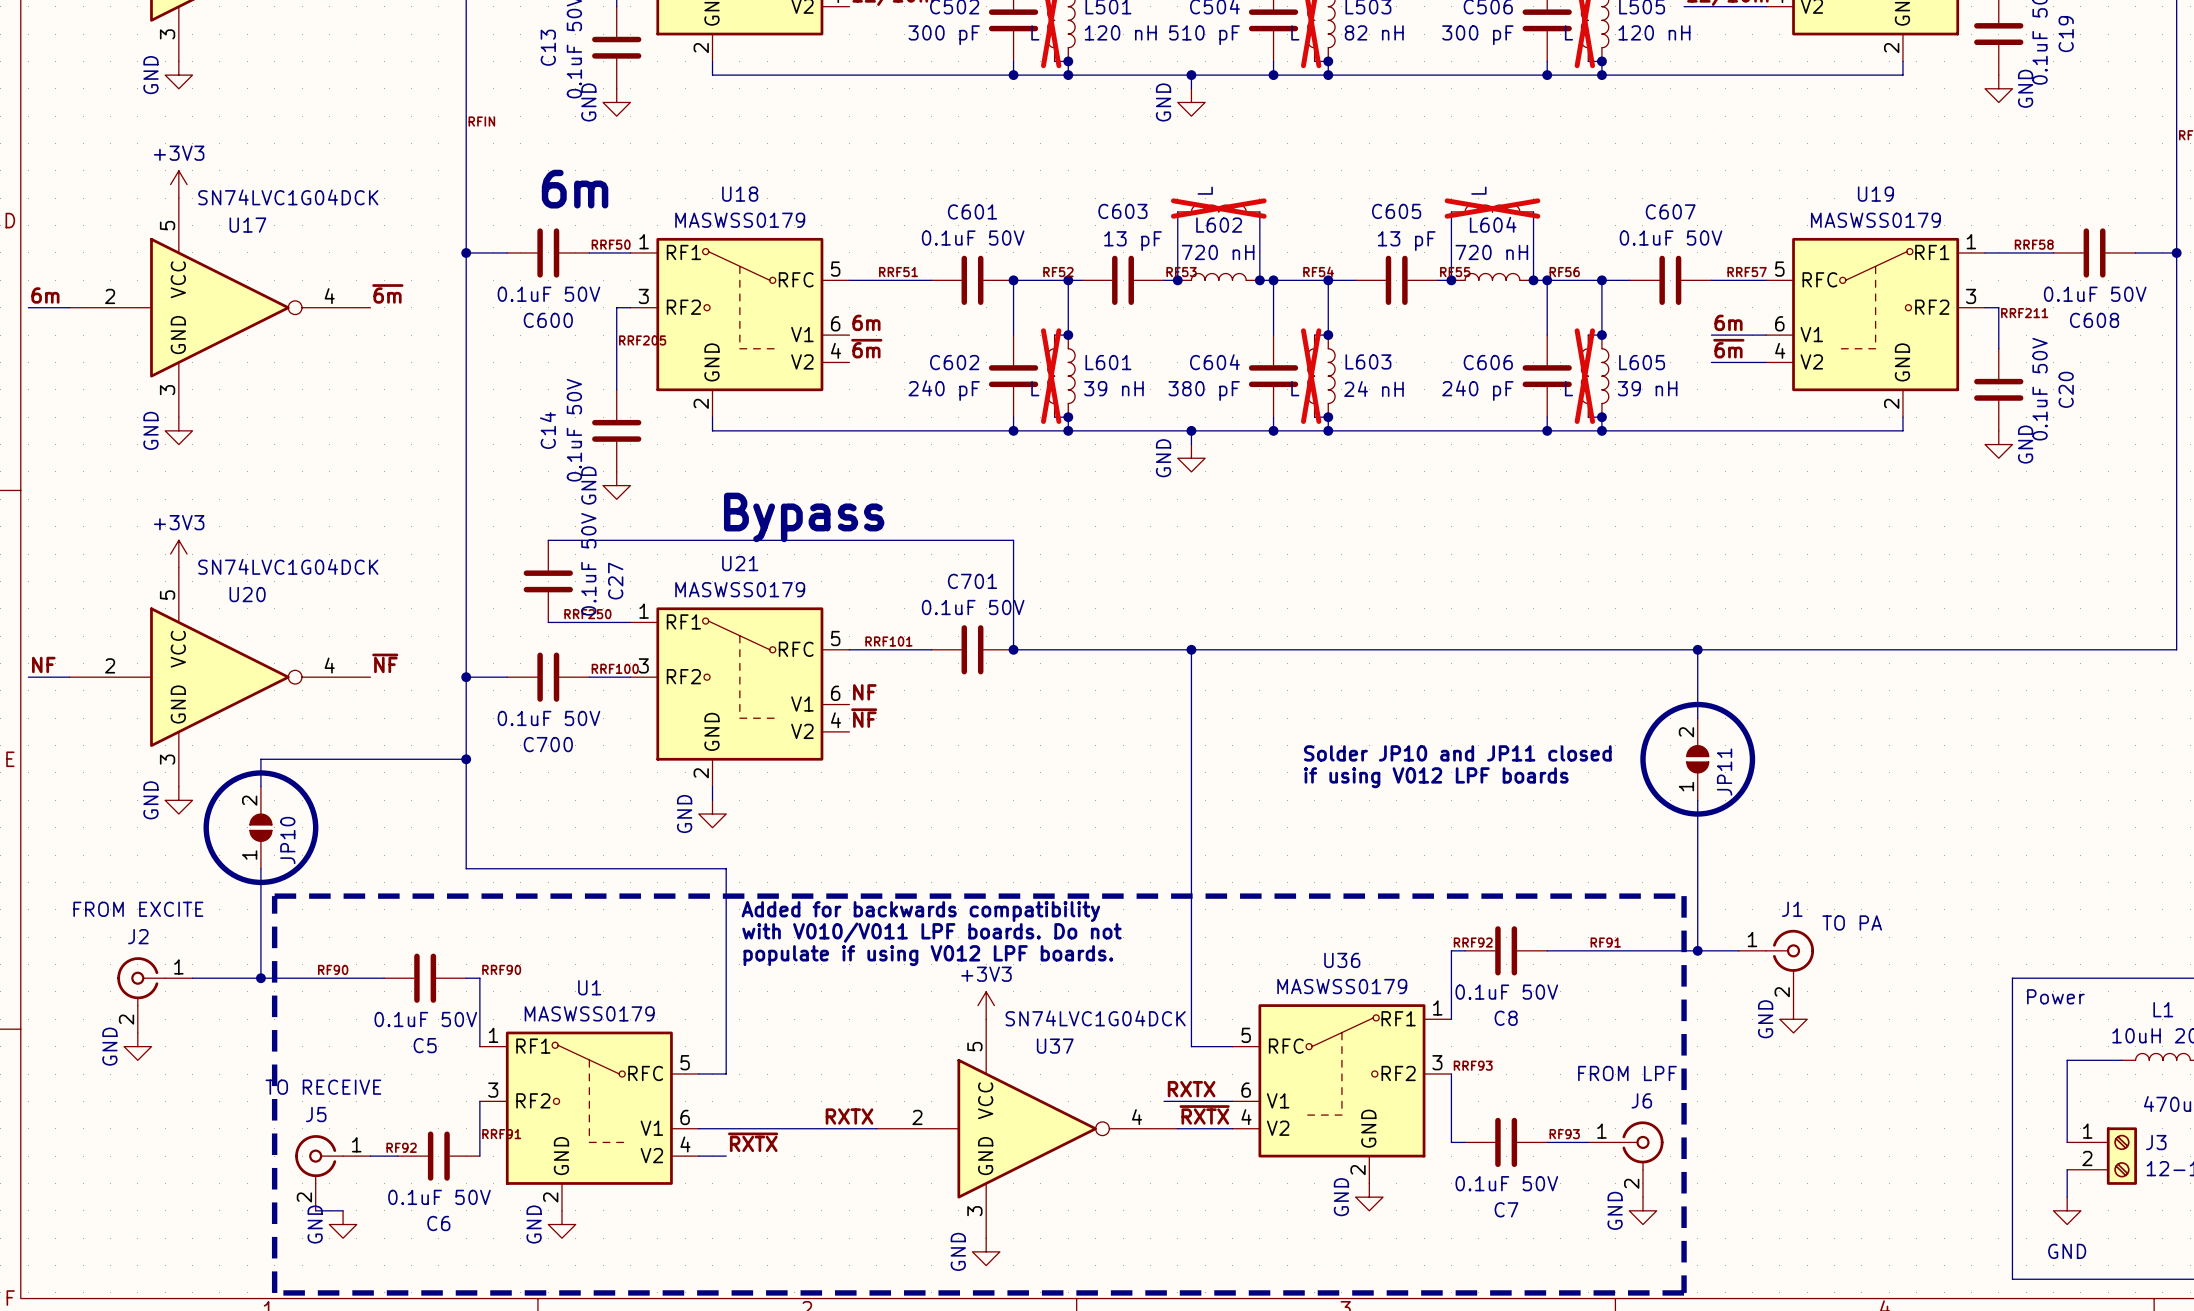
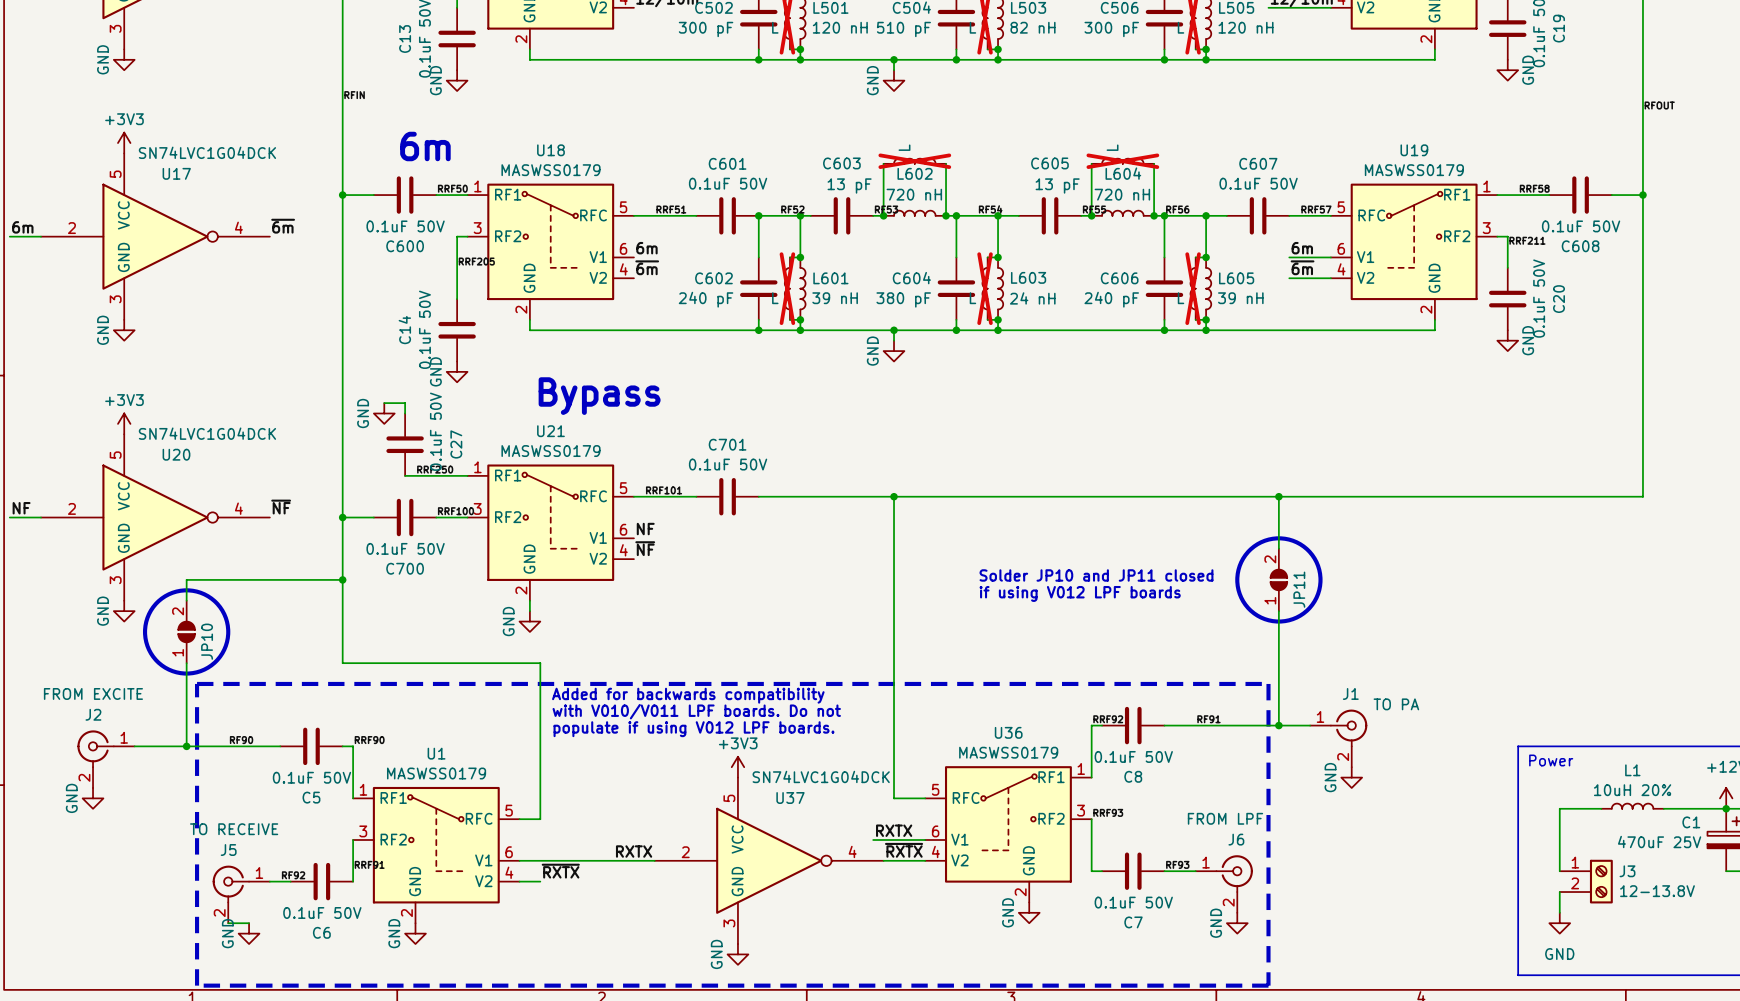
power symbol: none -> GND (384, 413)
wire: (548, 540) (1013, 540) (1013, 649) -> (405, 413) (405, 403) (384, 403)
junction: (1013, 649) -> none

